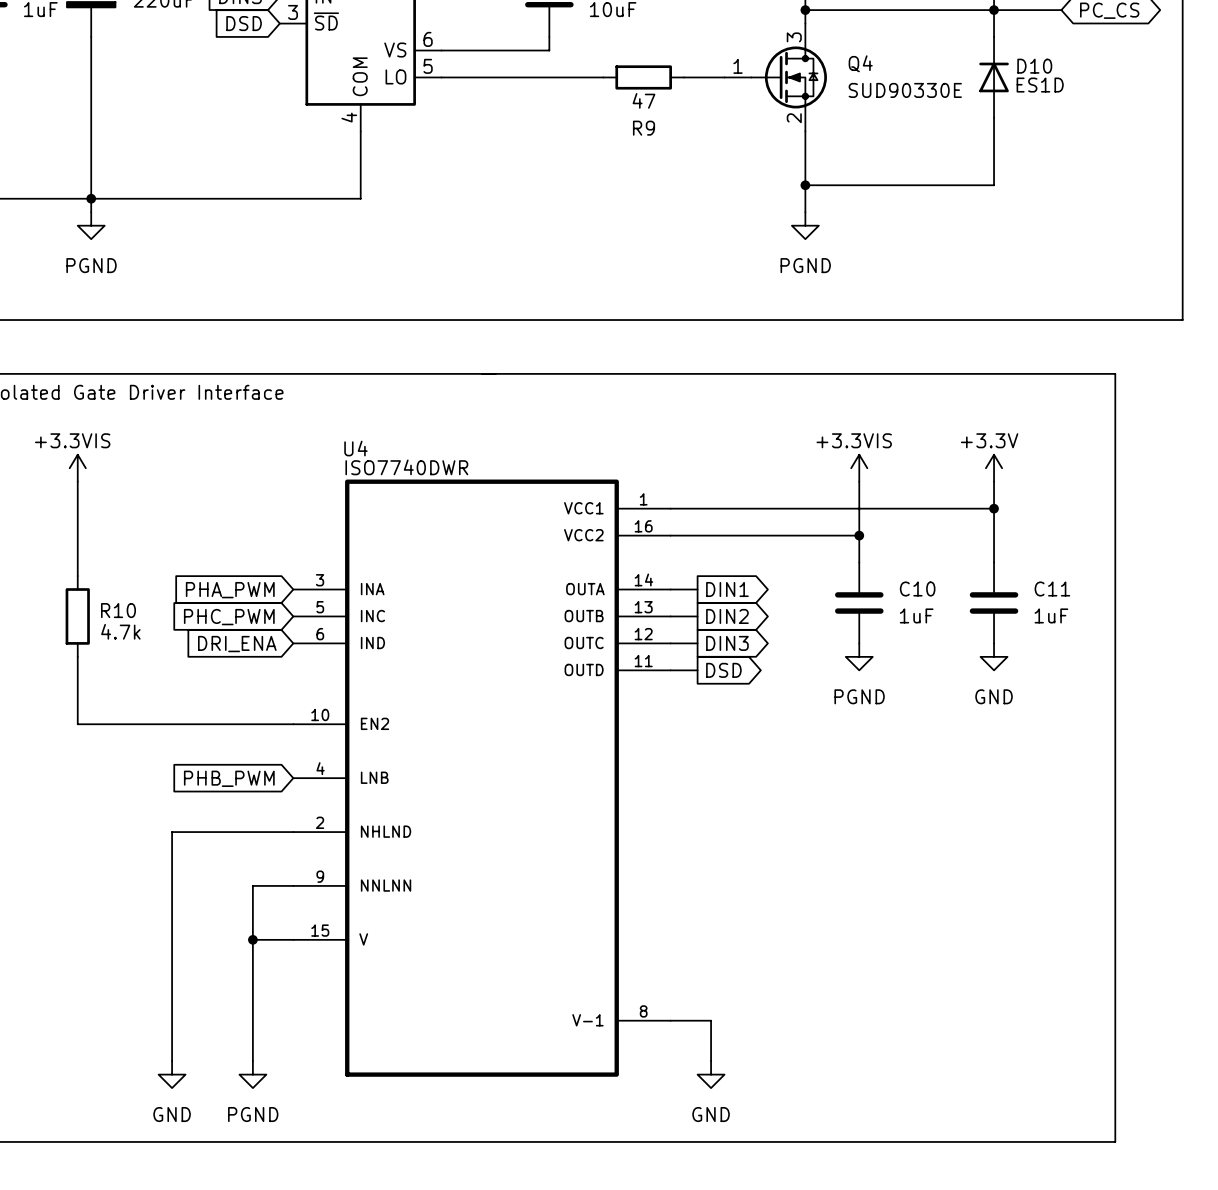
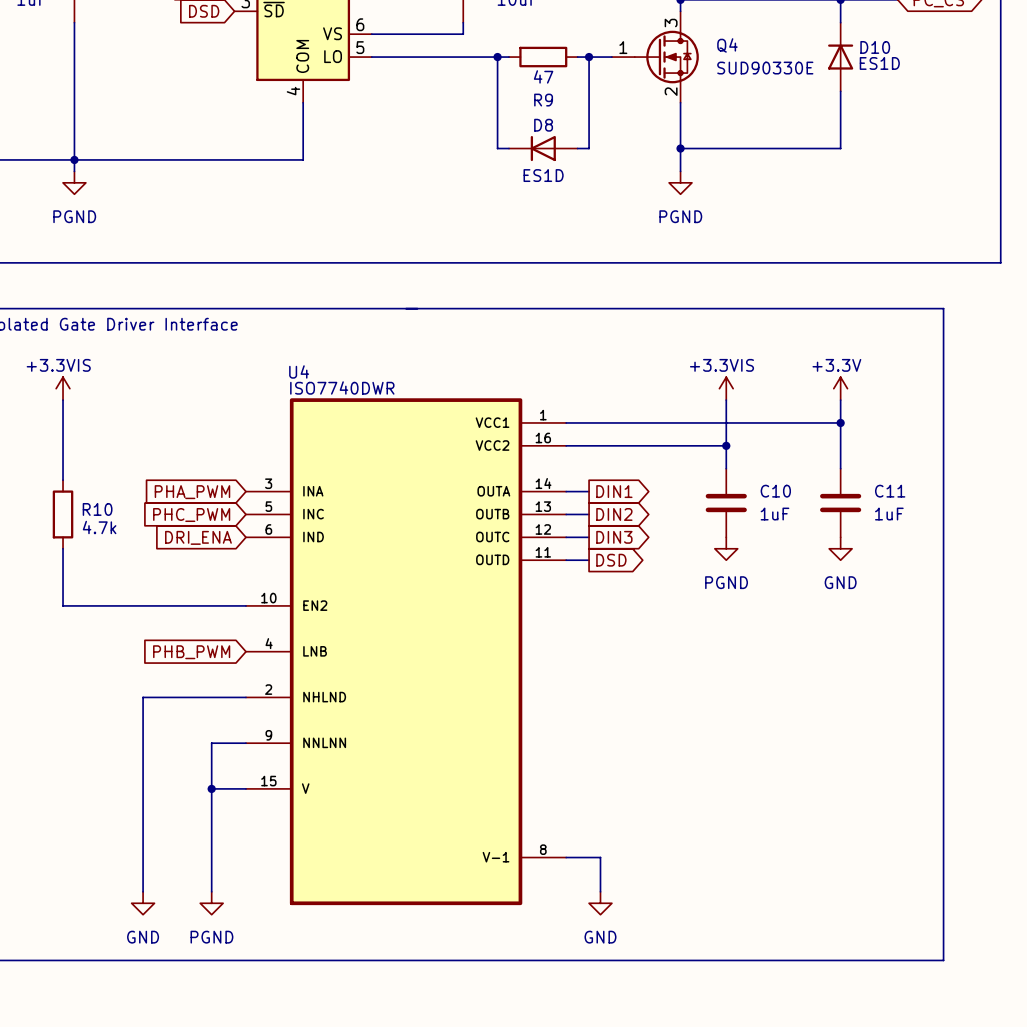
wire: none -> (497, 57) (497, 148) (509, 148)
junction: none -> (497, 57)
wire: none -> (589, 57) (589, 148) (577, 148)
junction: none -> (589, 57)
D8: none -> ES1D (543, 148)

